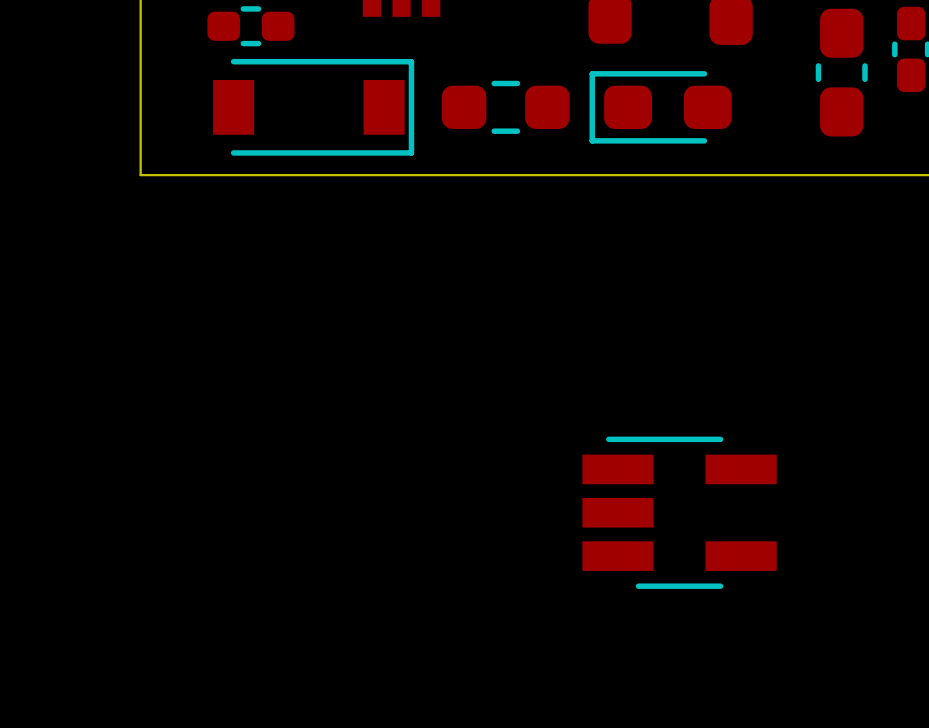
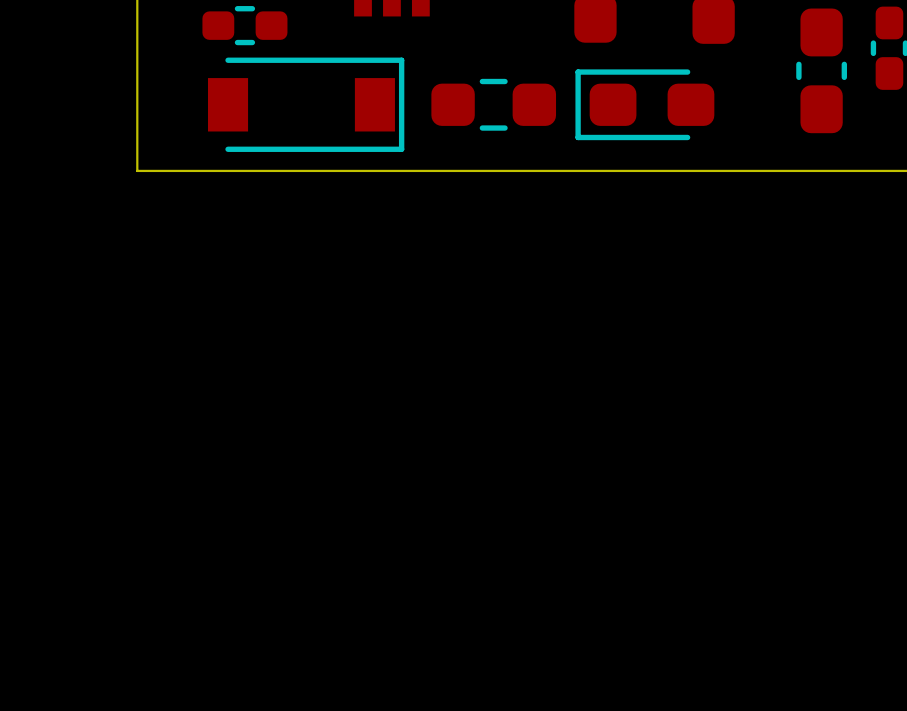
part: (679, 512) -> none

